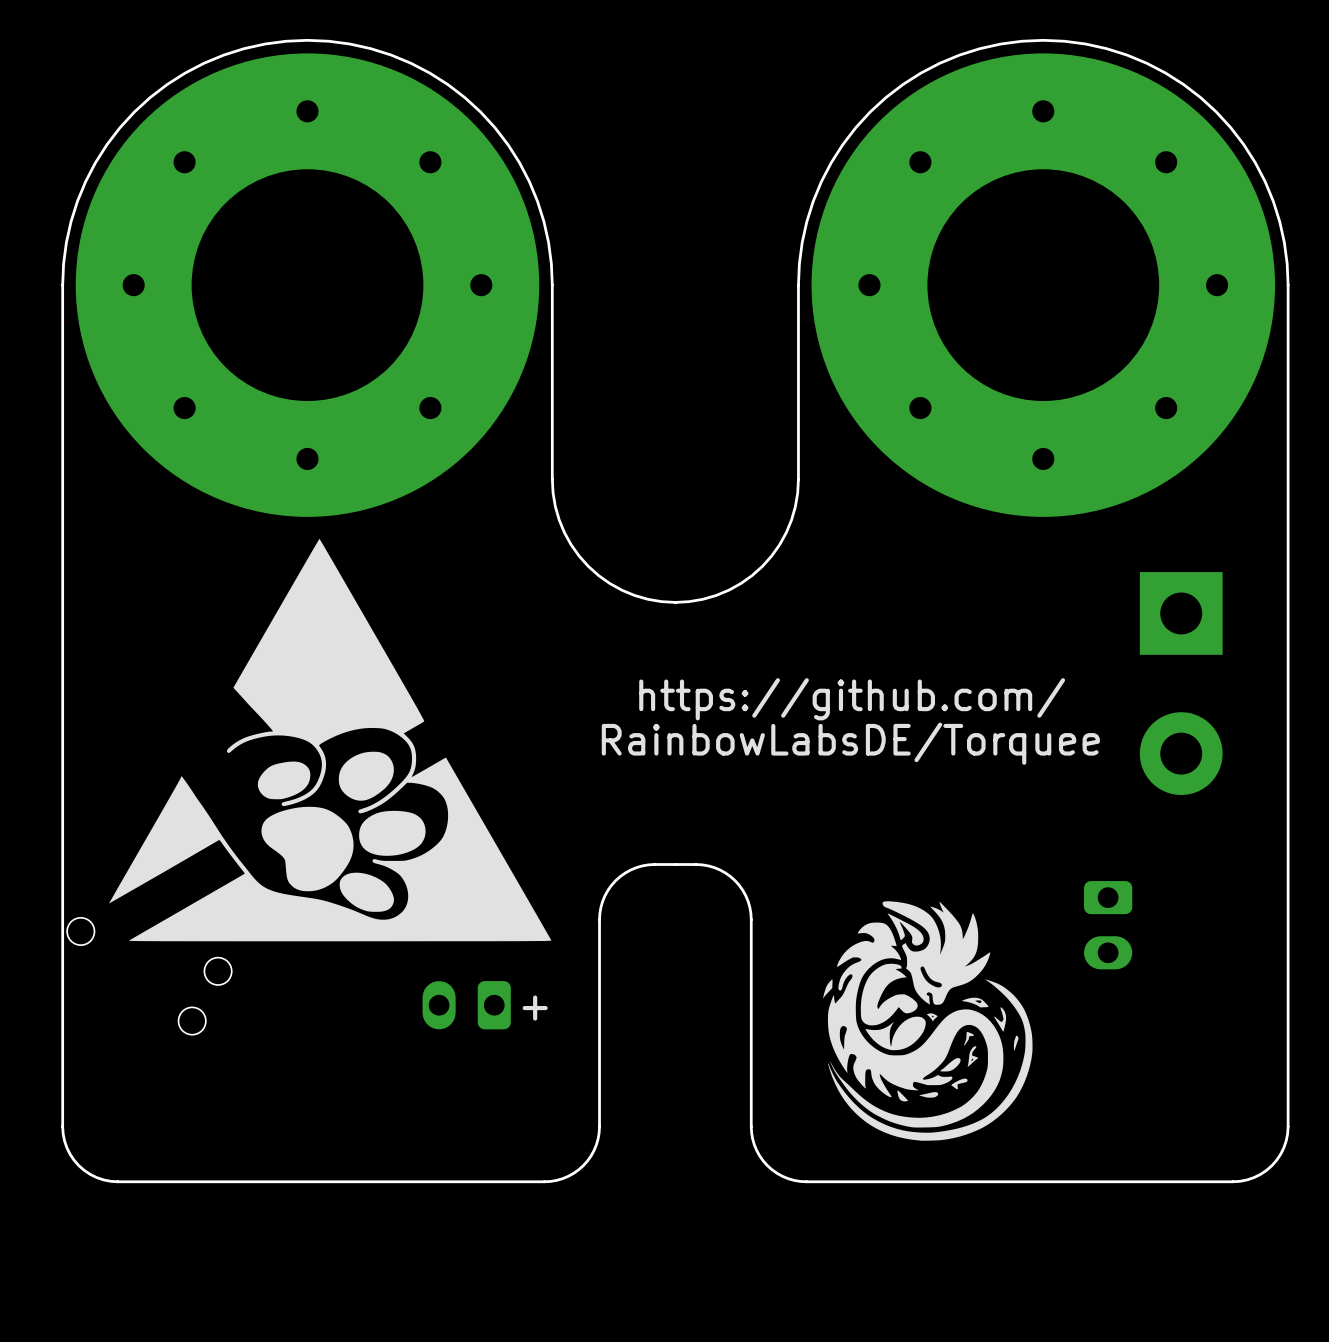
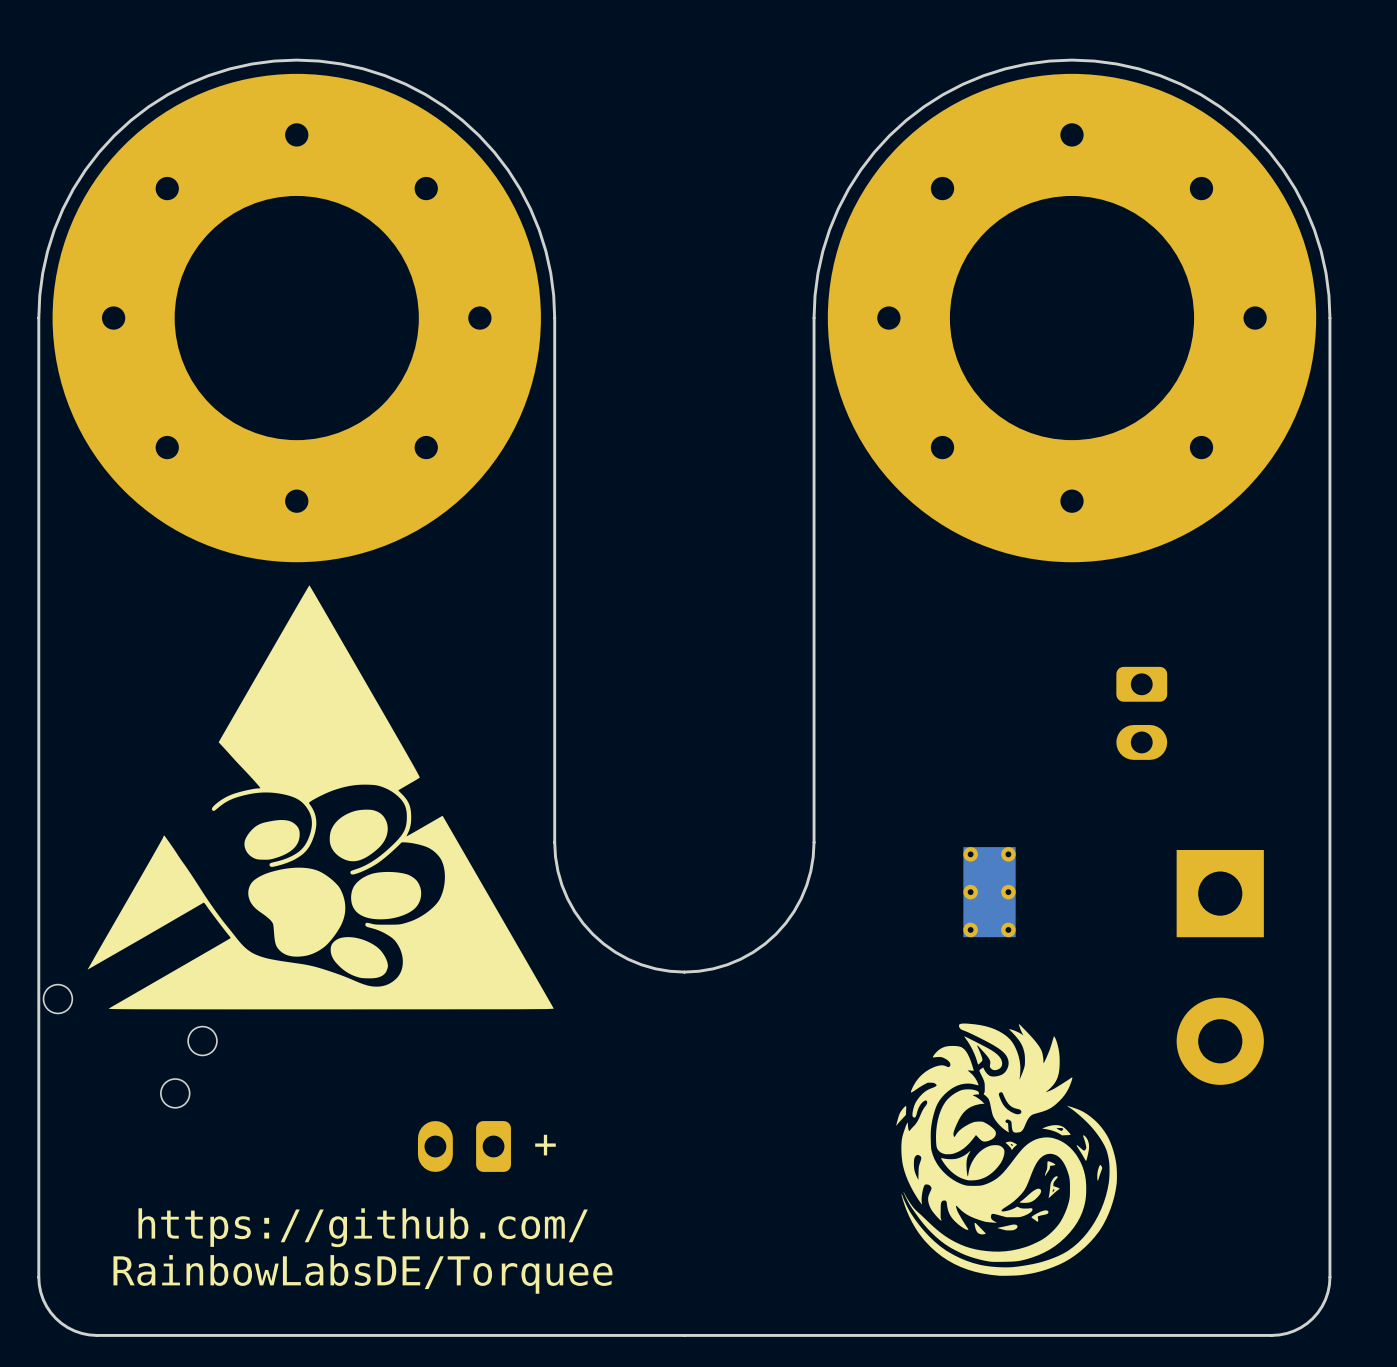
board edge: (798, 479) (795, 506) (786, 532) (779, 544) (762, 566) (740, 583) (716, 595) (702, 599) (675, 602) (661, 601) (634, 595) (609, 583) (588, 566) (571, 544) (564, 532) (555, 506) (552, 479) -> (814, 522) (814, 842) (813, 856) (806, 885) (801, 898) (785, 923) (765, 943) (740, 959) (727, 964) (698, 971) (684, 972) (655, 968) (641, 964) (628, 959) (603, 943) (582, 923) (567, 898) (561, 885) (555, 856) (554, 842) (554, 522)
part position: (1181, 683) -> (1220, 967)
text position: https://github.com/ (852, 699) -> https://github.com/ (363, 1227)
text position: RainbowLabsDE/Torquee (850, 743) -> RainbowLabsDE/Torquee (362, 1274)
part: none -> (989, 892)
part position: (1108, 925) -> (1141, 713)
part position: (466, 1005) -> (464, 1146)
text position: + (535, 1008) -> + (545, 1145)
drawing position: (927, 1021) -> (1006, 1149)
board edge: (1288, 1126) (1283, 1147) (1271, 1165) (1260, 1174) (1240, 1181) (806, 1181) (782, 1176) (772, 1169) (759, 1155) (751, 1132) (749, 907) (742, 890) (730, 876) (714, 867) (696, 864) (654, 864) (636, 867) (615, 880) (604, 895) (599, 919) (599, 1132) (594, 1150) (587, 1161) (578, 1169) (562, 1178) (544, 1181) (110, 1181) (90, 1174) (74, 1160) (66, 1147) (62, 1126) -> (1329, 1204) (1329, 1277) (1325, 1299) (1317, 1312) (1307, 1323) (1294, 1331) (1279, 1334) (96, 1335) (81, 1333) (67, 1327) (50, 1312) (43, 1299) (38, 1277) (38, 1204)

